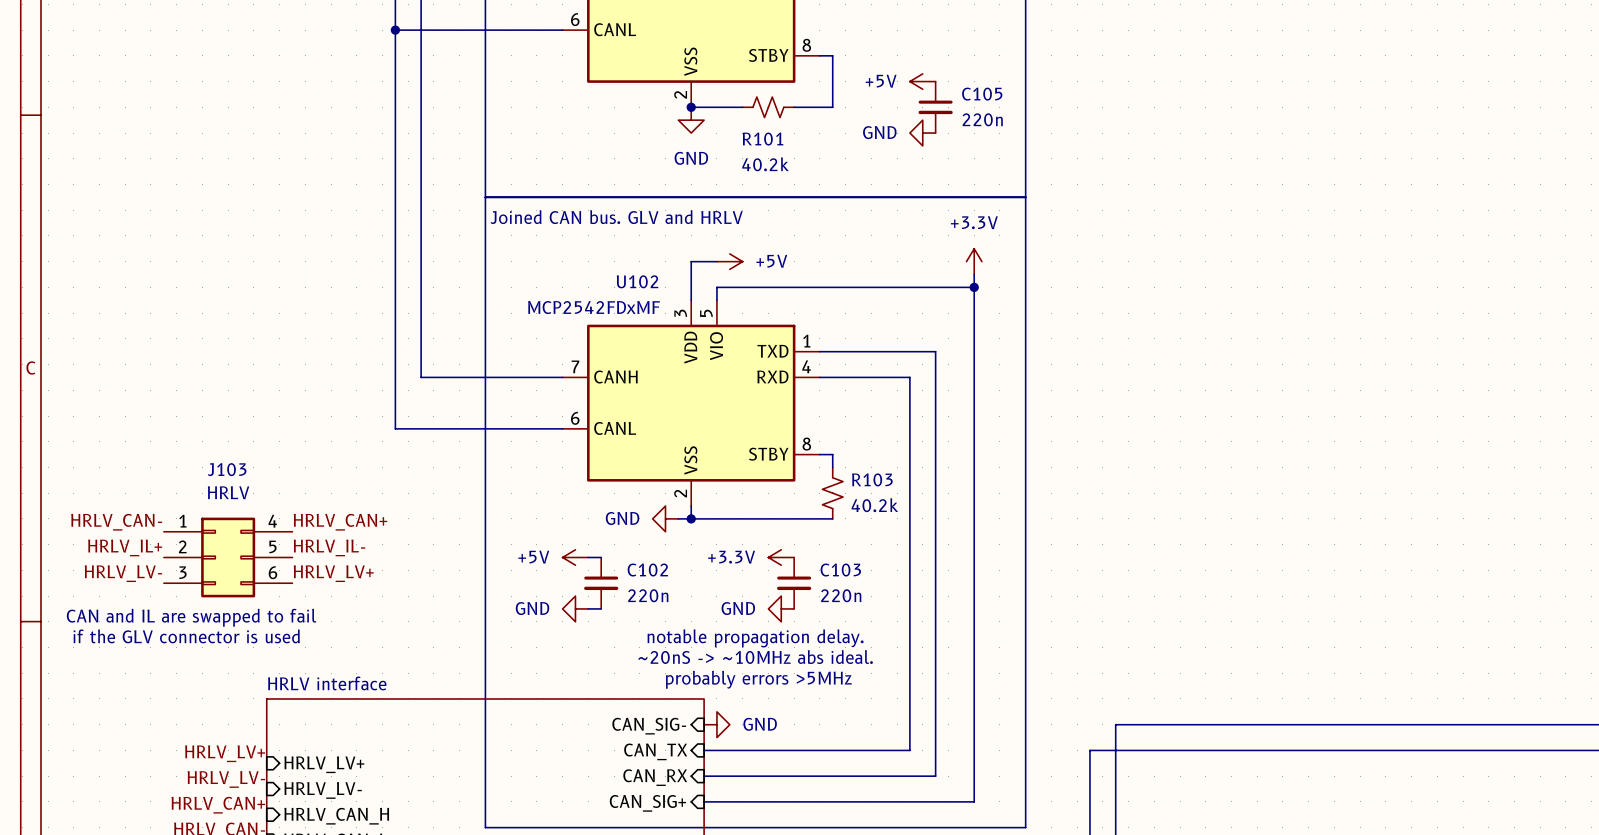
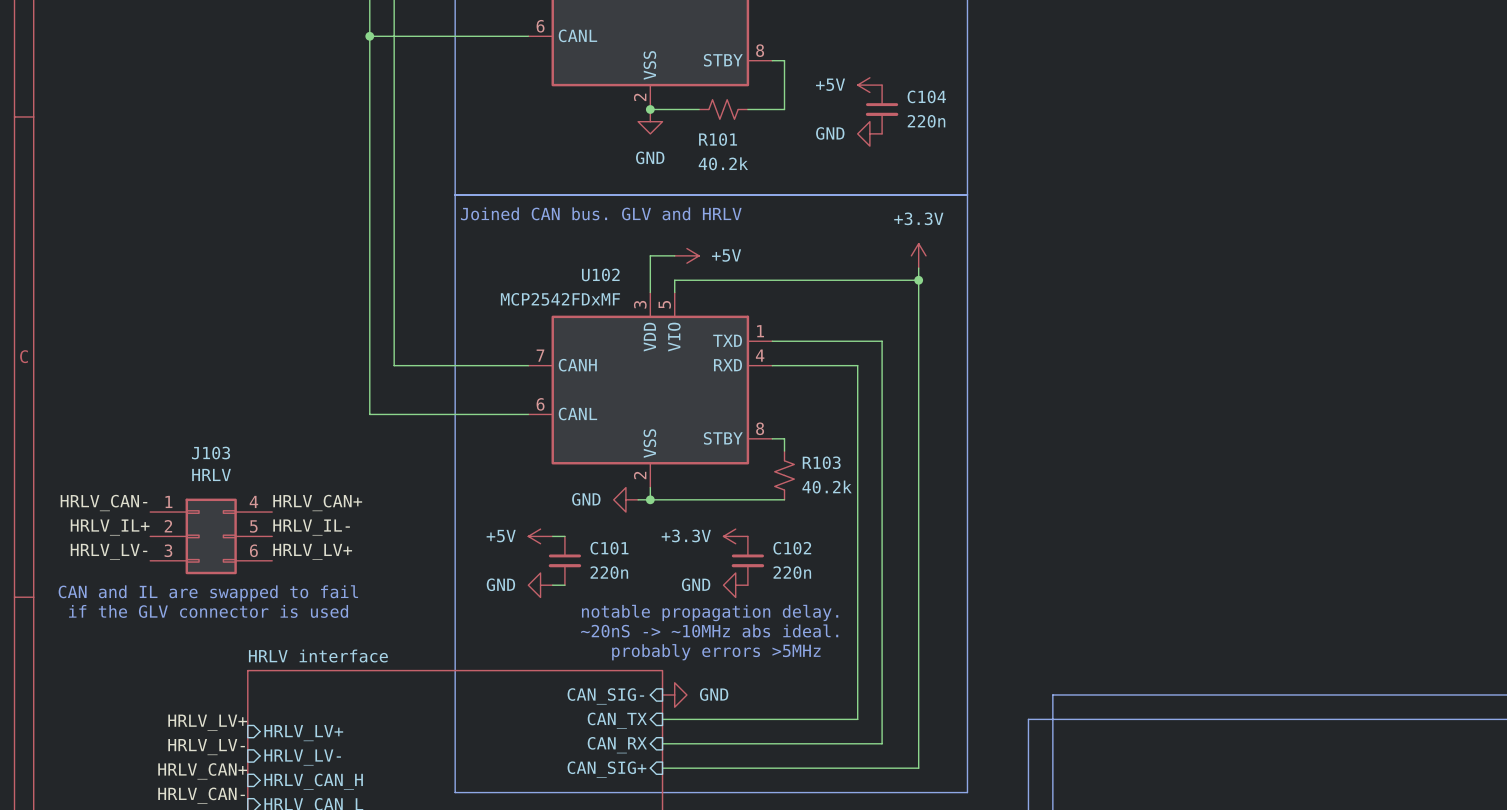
C105 name: C105 (982, 94) -> C104 (926, 96)
C102 name: C102 (647, 570) -> C101 (609, 548)
C103 name: C103 (840, 570) -> C102 (792, 548)

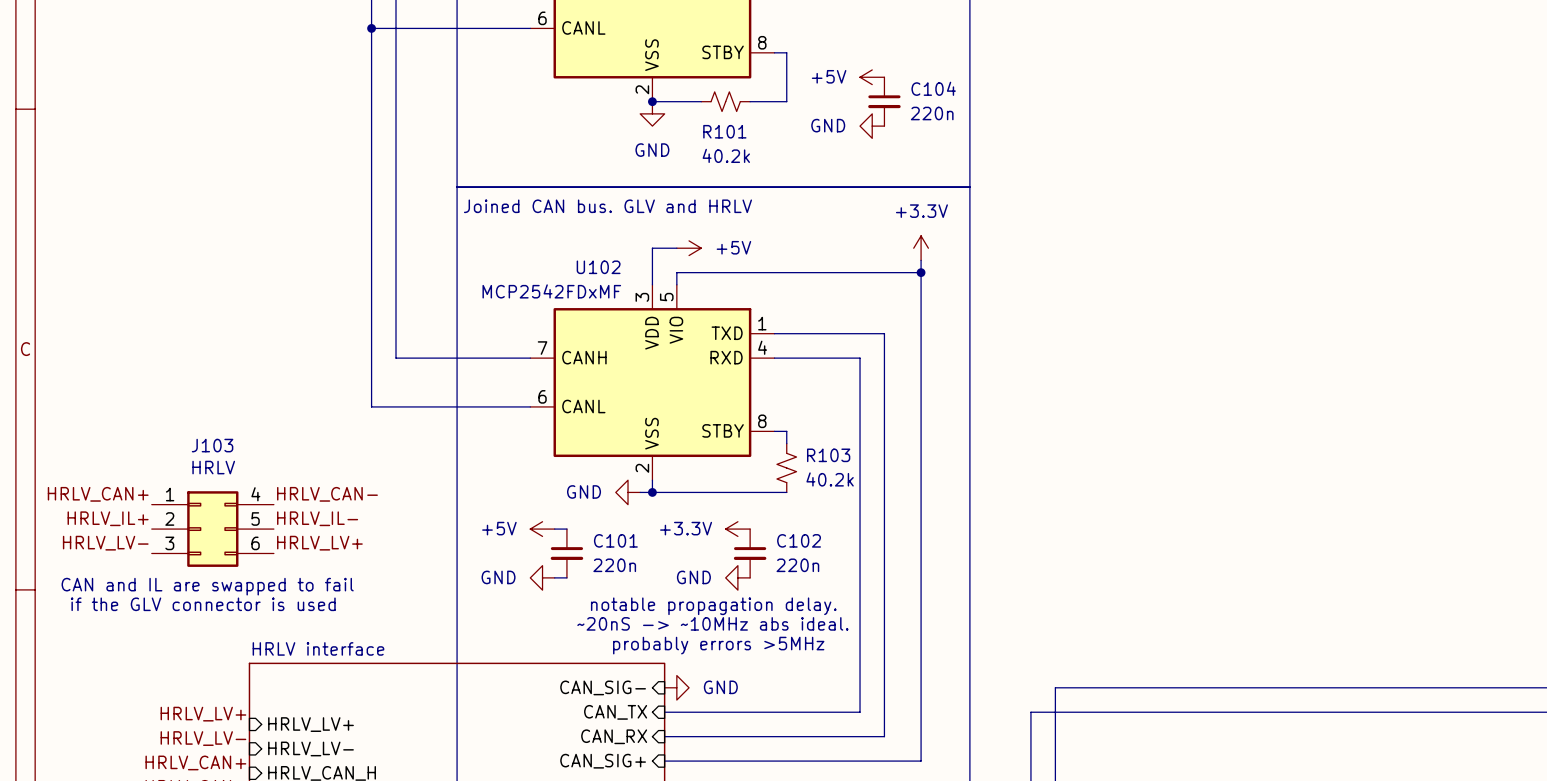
label: HRLV_CAN- (103, 503) -> HRLV_CAN+ (98, 494)
label: HRLV_CAN+ (317, 503) -> HRLV_CAN- (327, 494)

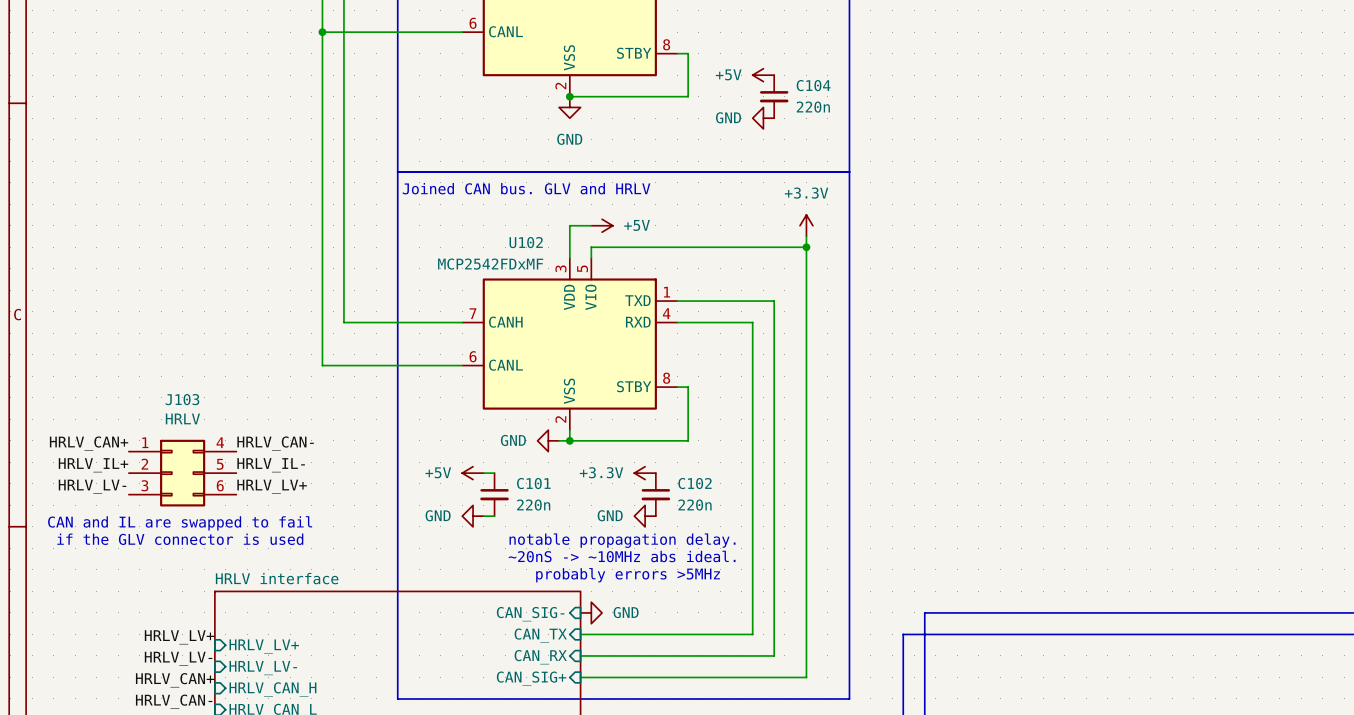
R101: 40.2k (725, 101) -> none
R103: 40.2k (786, 468) -> none

